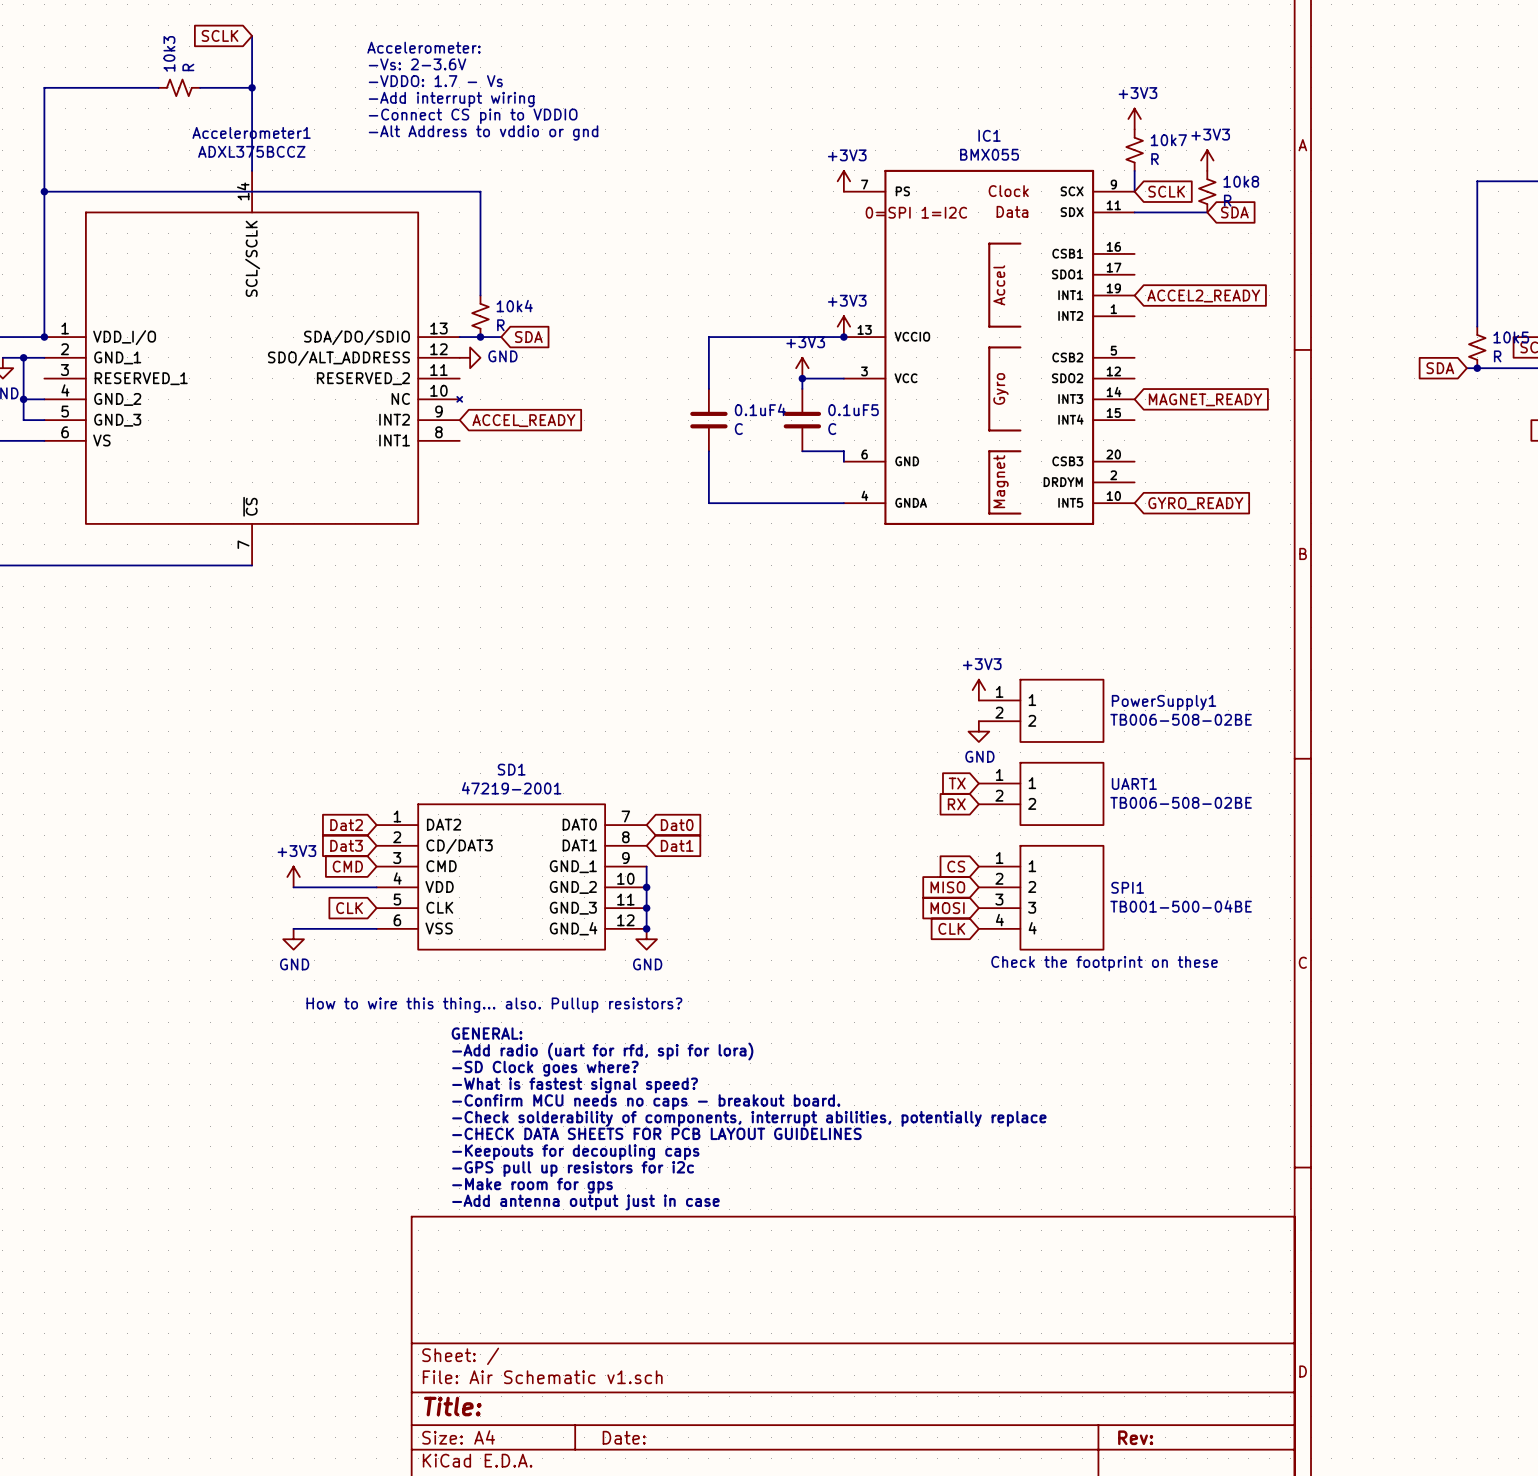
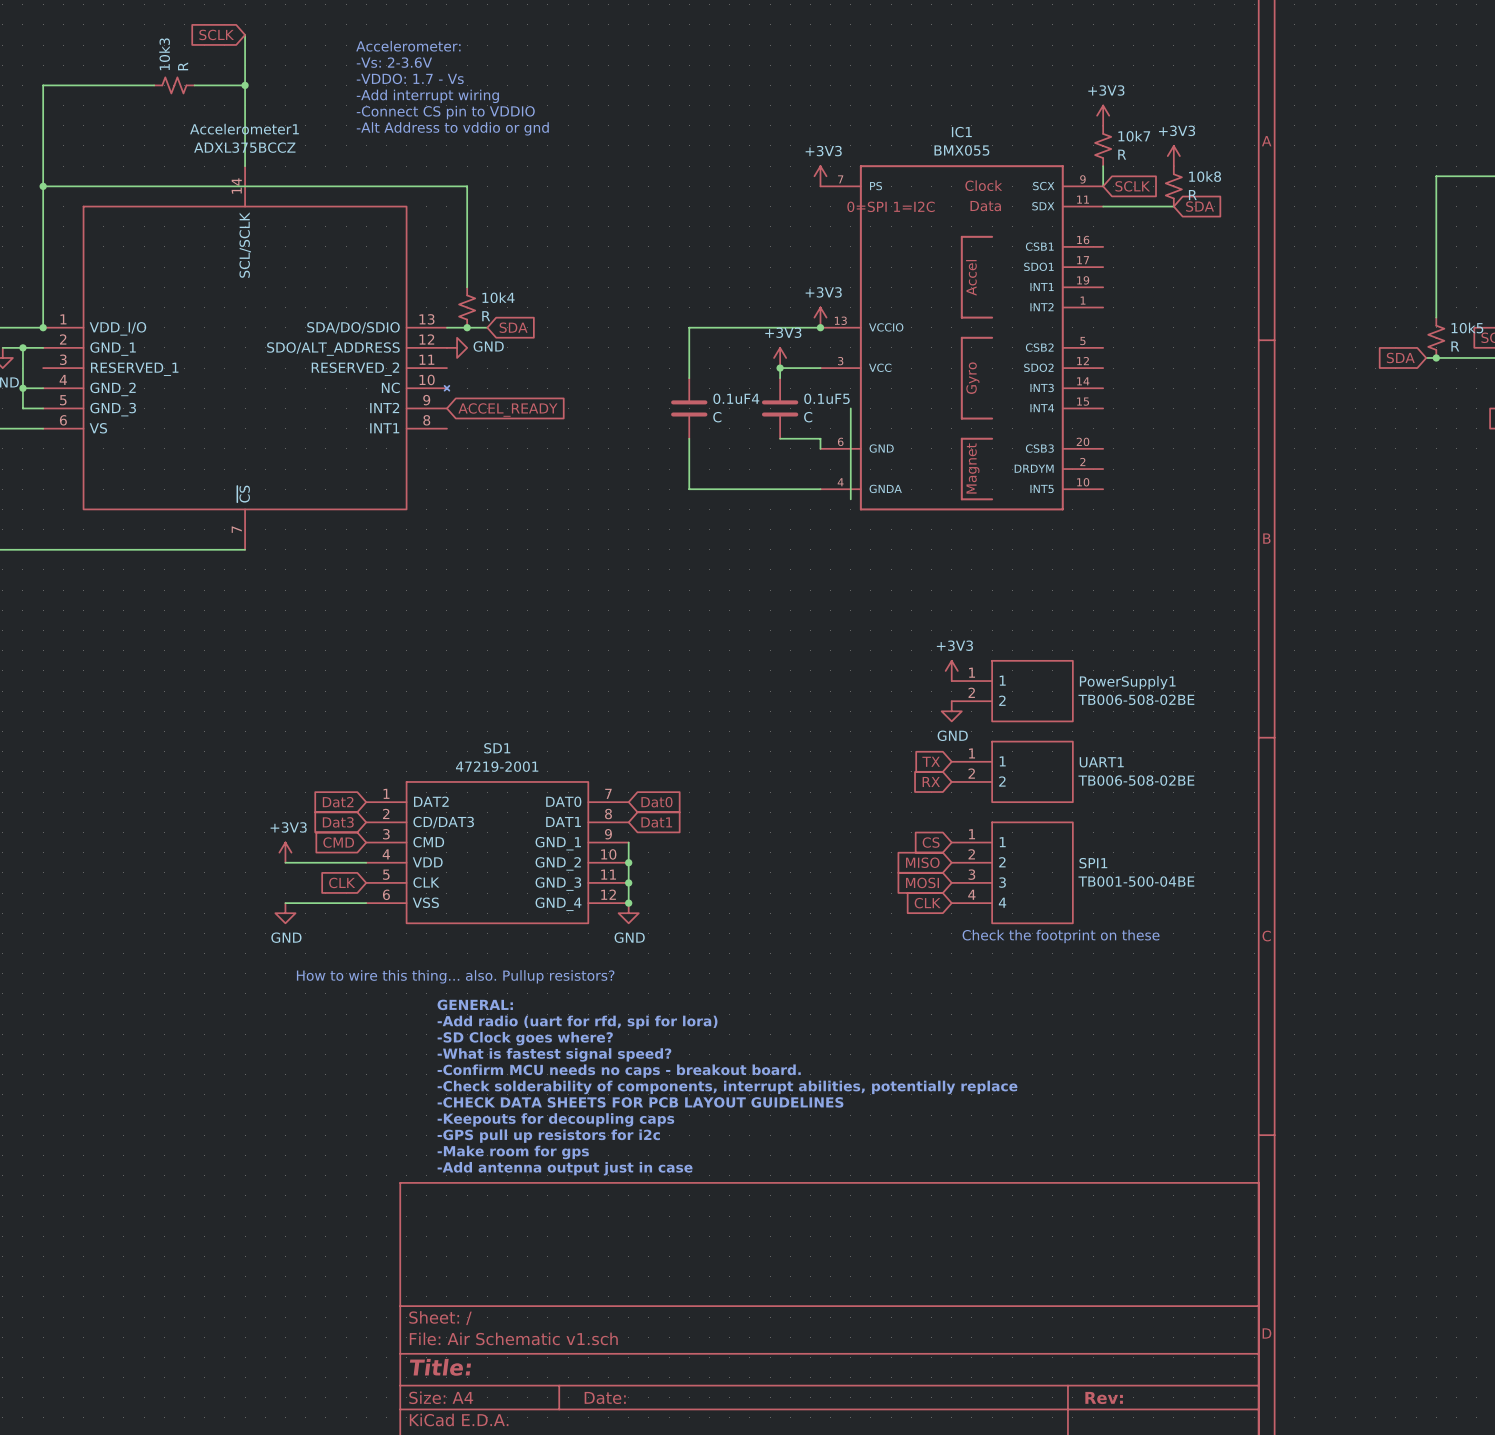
global label: ACCEL2_READY (1203, 296) -> none
global label: MAGNET_READY (1205, 399) -> none
wire: none -> (850, 408) (850, 499)
global label: GYRO_READY (1195, 503) -> none

